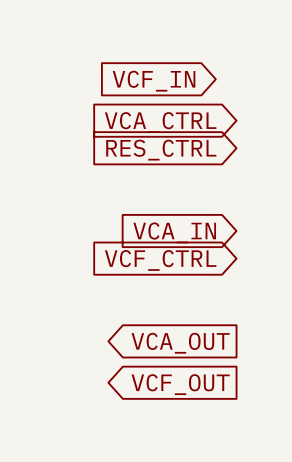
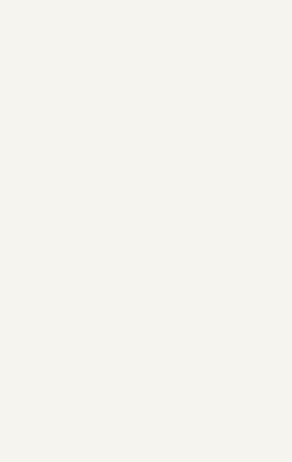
global label: VCF_IN (154, 81) -> none
global label: VCA_CTRL (160, 122) -> none
global label: RES_CTRL (161, 150) -> none
global label: VCA_IN (174, 232) -> none
global label: VCF_CTRL (160, 260) -> none
global label: VCA_OUT (180, 343) -> none
global label: VCF_OUT (180, 384) -> none

